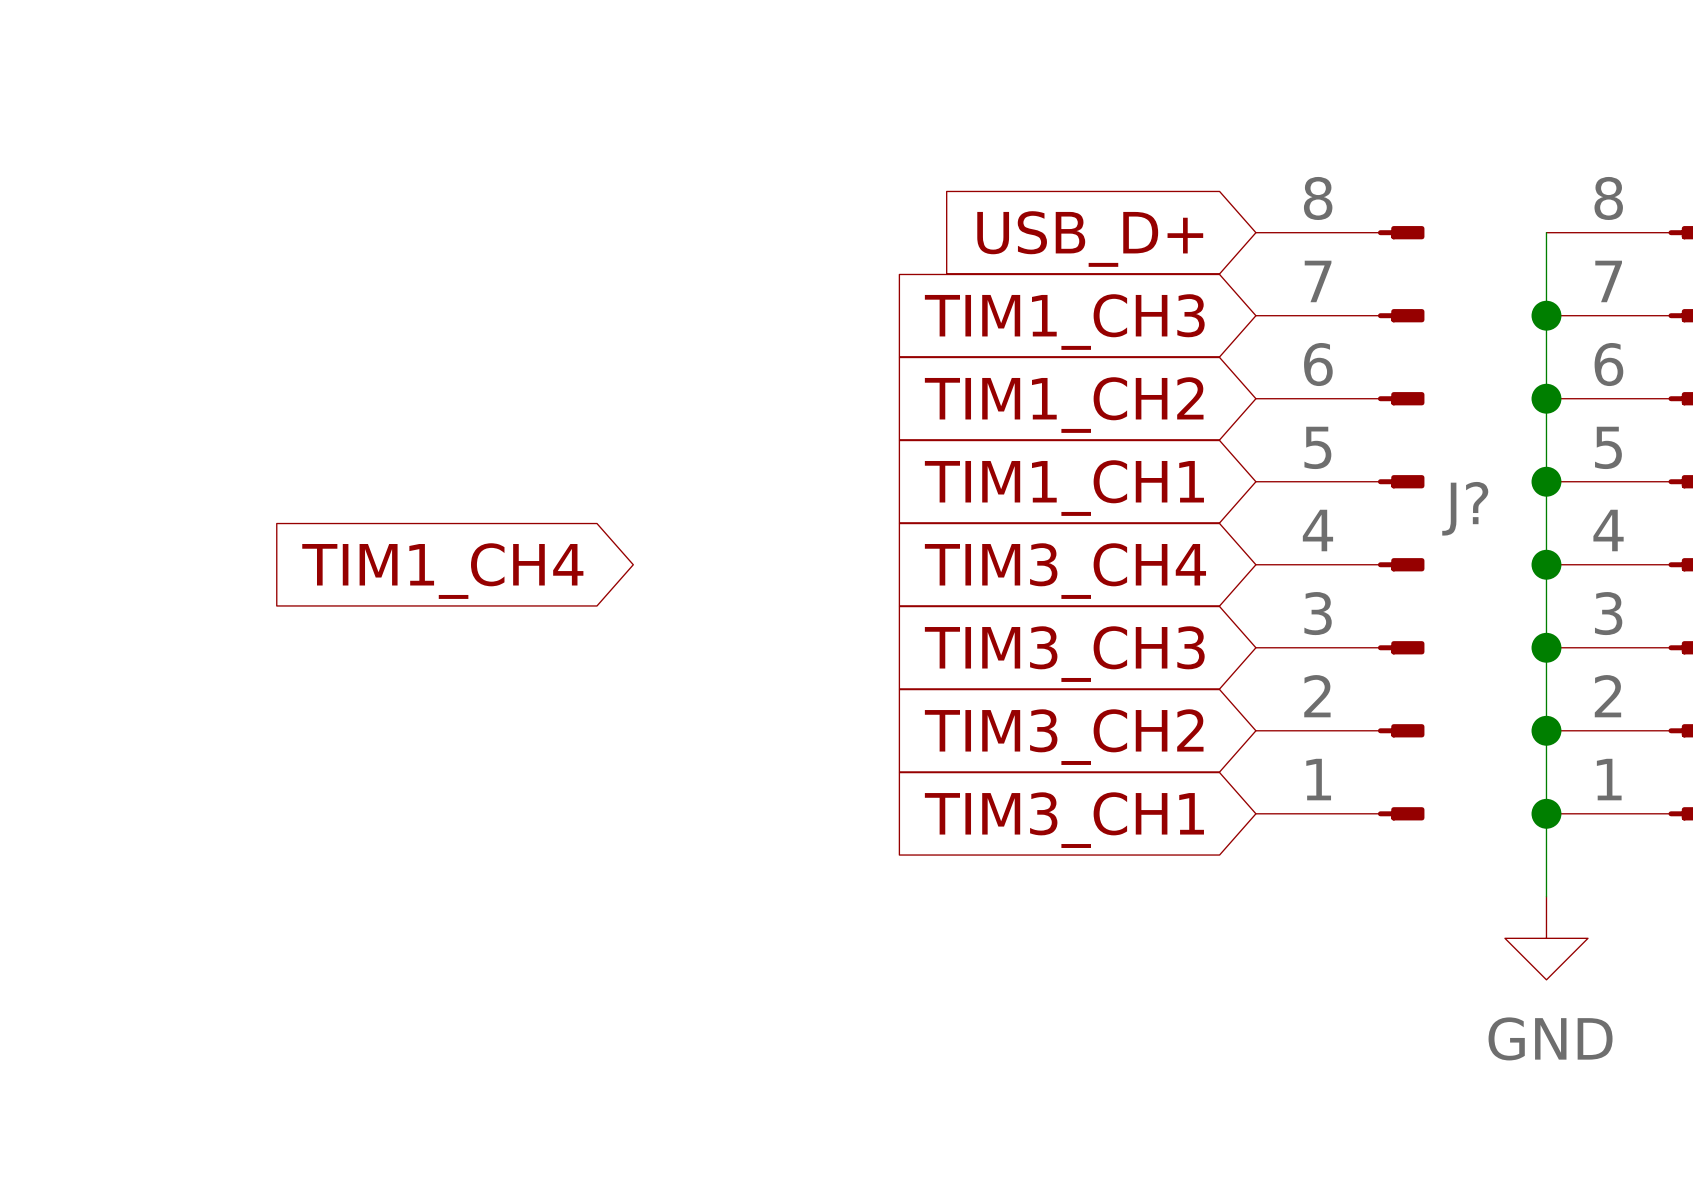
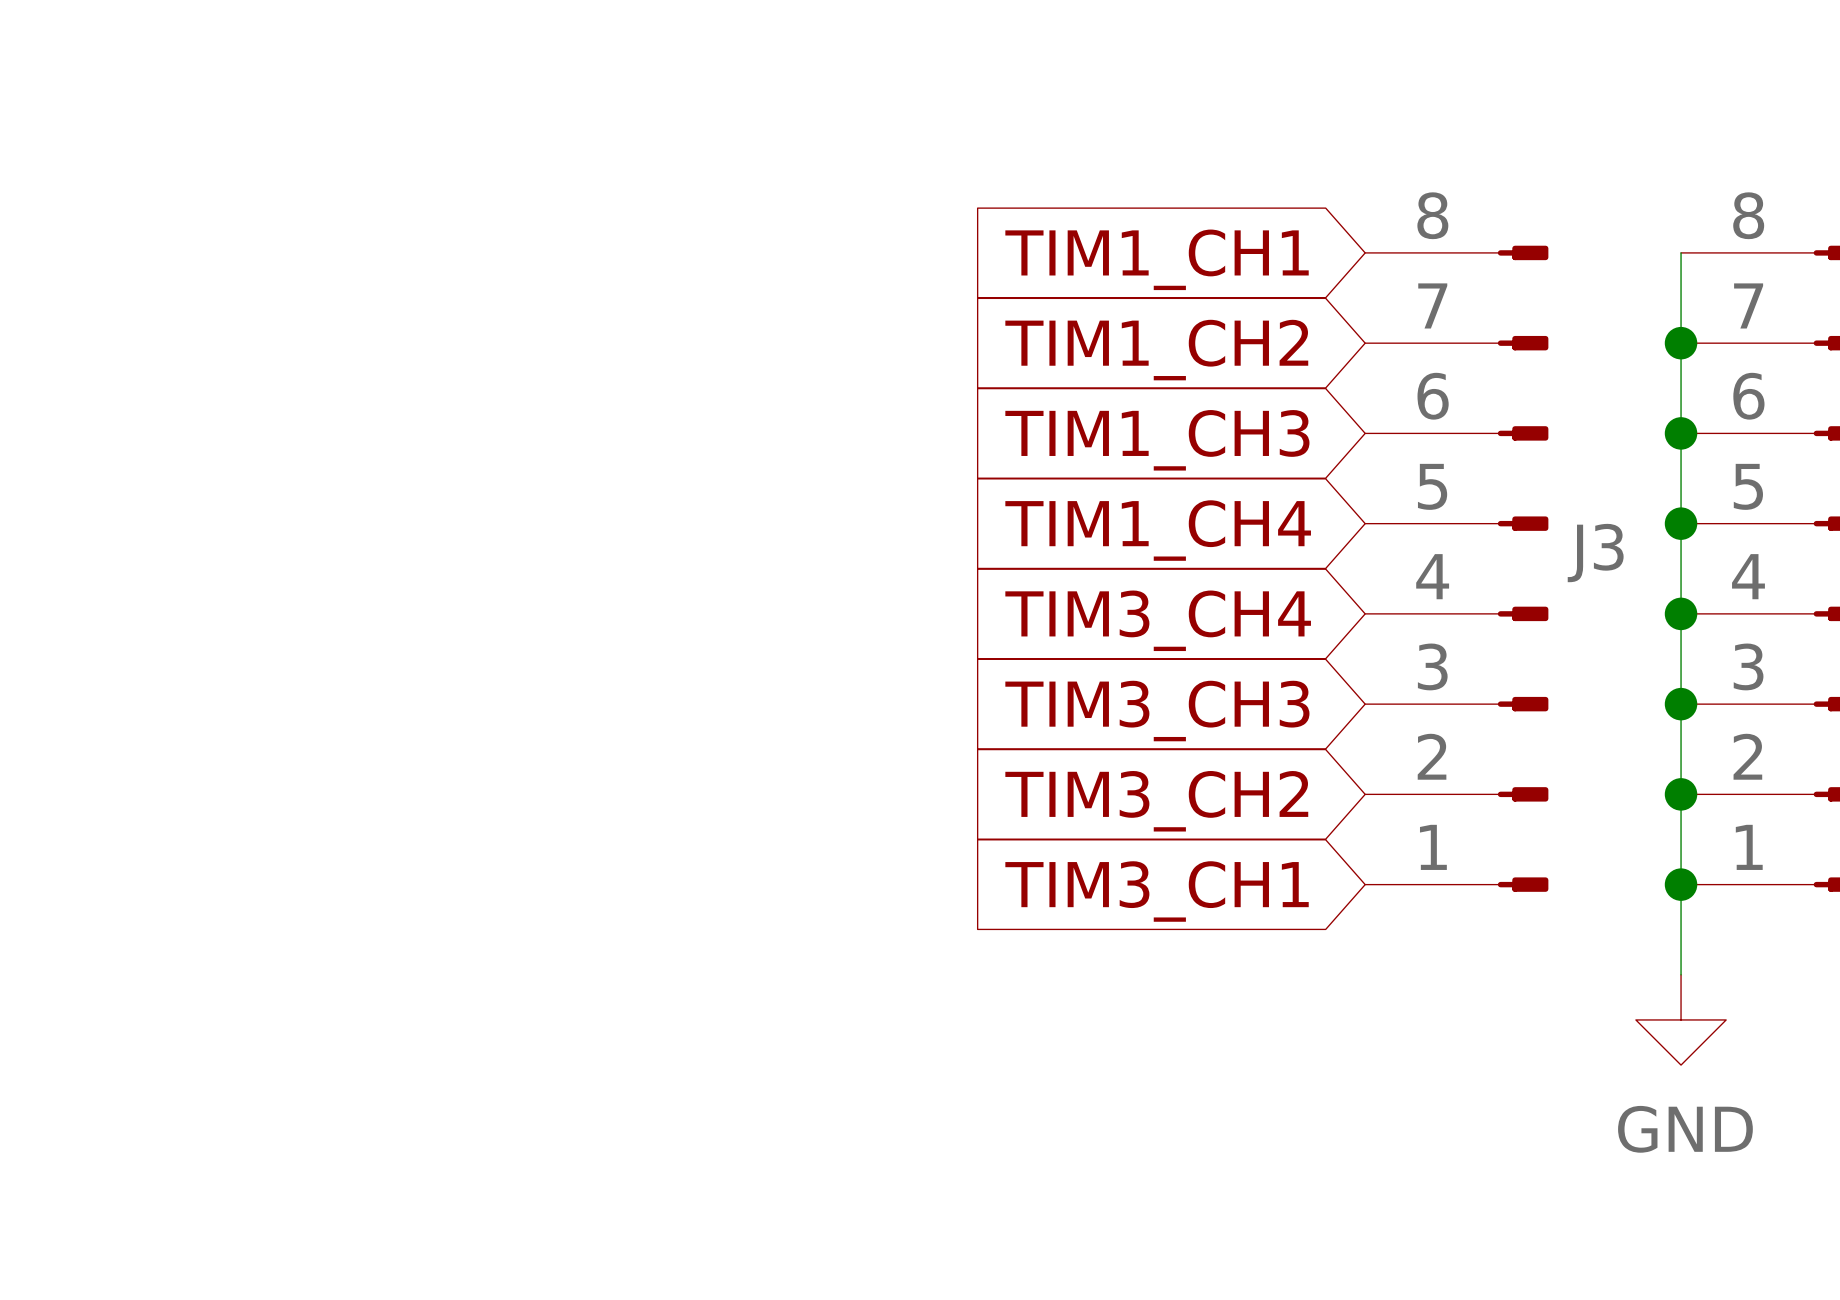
global label: USB_D+ (1090, 239) -> TIM1_CH1 (1157, 259)
global label: TIM1_CH3 (1064, 322) -> TIM1_CH2 (1156, 350)
global label: TIM1_CH2 (1064, 405) -> TIM1_CH3 (1157, 440)
global label: TIM1_CH1 (1064, 488) -> TIM1_CH4 (1158, 530)
J? name: J? (1465, 508) -> J3 (1595, 553)
global label: TIM1_CH4 (442, 571) -> none

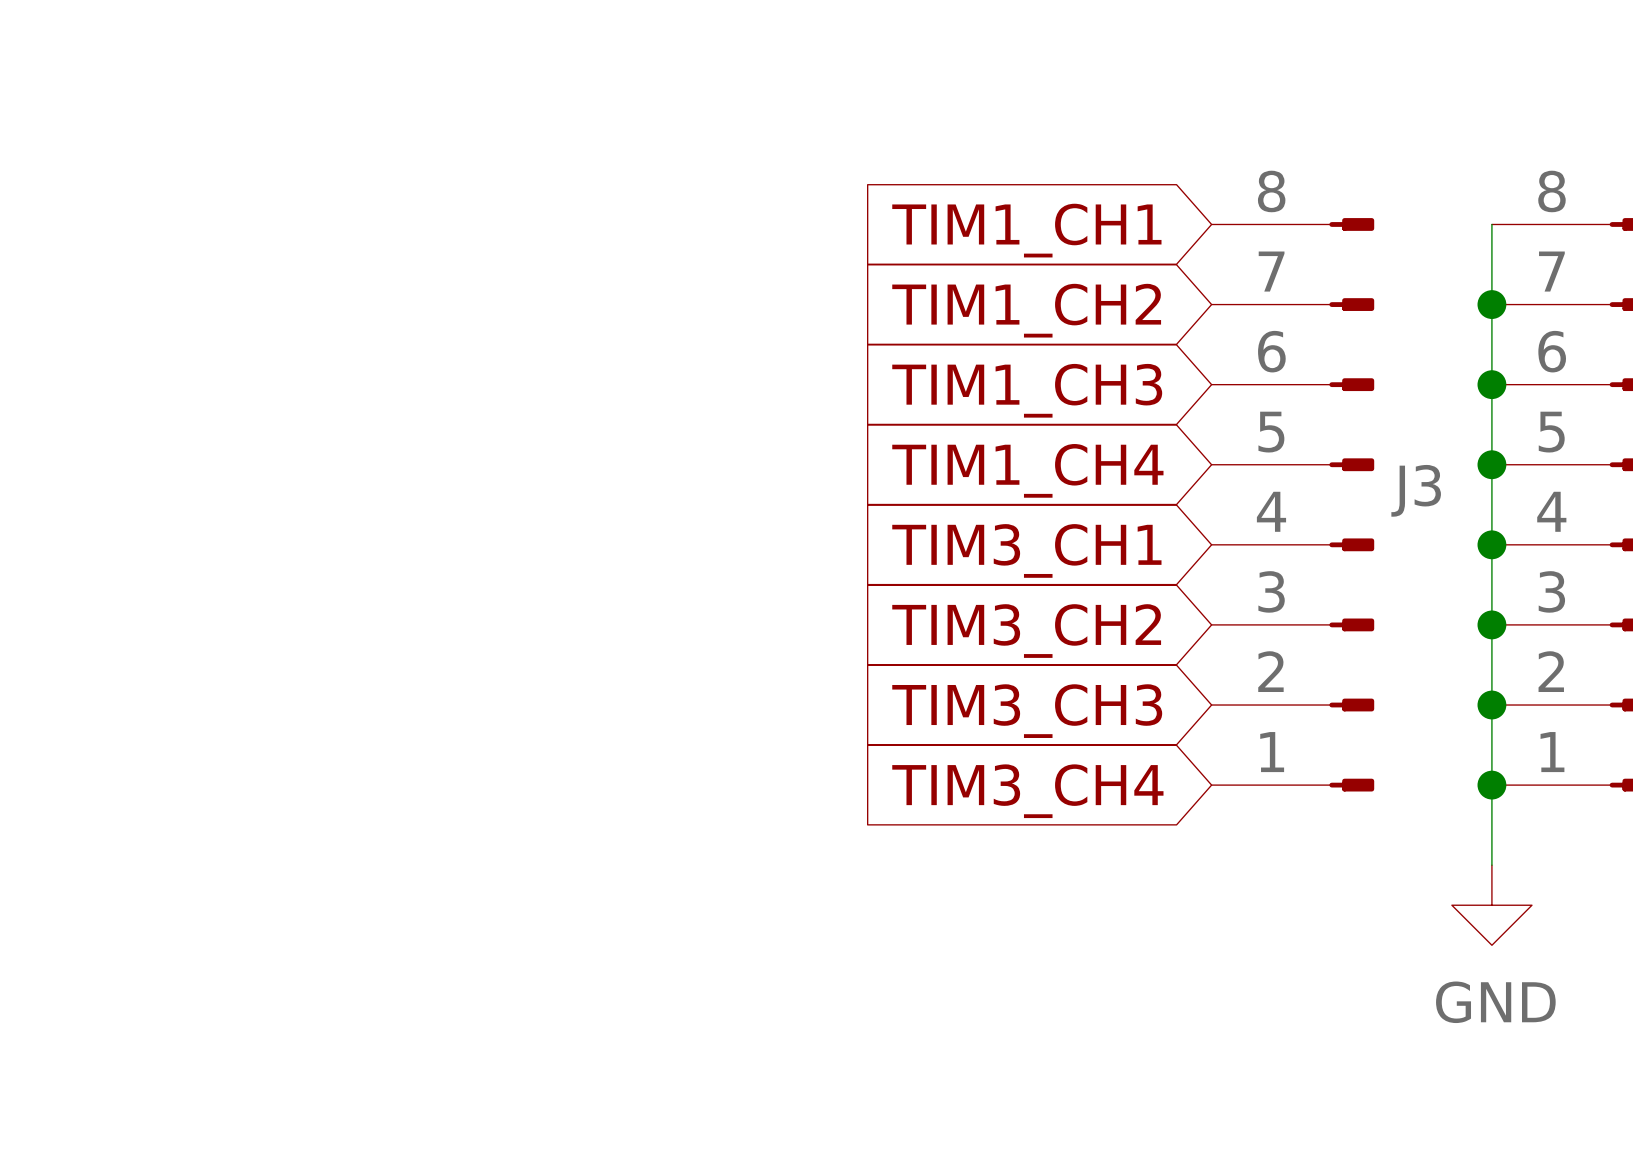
global label: TIM3_CH4 (1158, 620) -> TIM3_CH1 (1026, 550)
global label: TIM3_CH3 (1157, 711) -> TIM3_CH2 (1026, 631)
global label: TIM3_CH2 (1156, 801) -> TIM3_CH3 (1027, 711)
global label: TIM3_CH1 (1157, 891) -> TIM3_CH4 (1027, 791)

